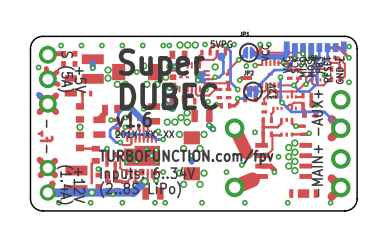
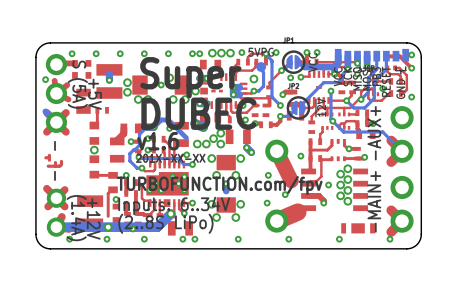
part: none -> (255, 110)
part: (219, 93) -> none
part: none -> (265, 110)
part: (228, 93) -> none
bottom track: (130, 107) (145, 123) -> (153, 127) (161, 119) (168, 119) (186, 138)
via: none -> (268, 175)

